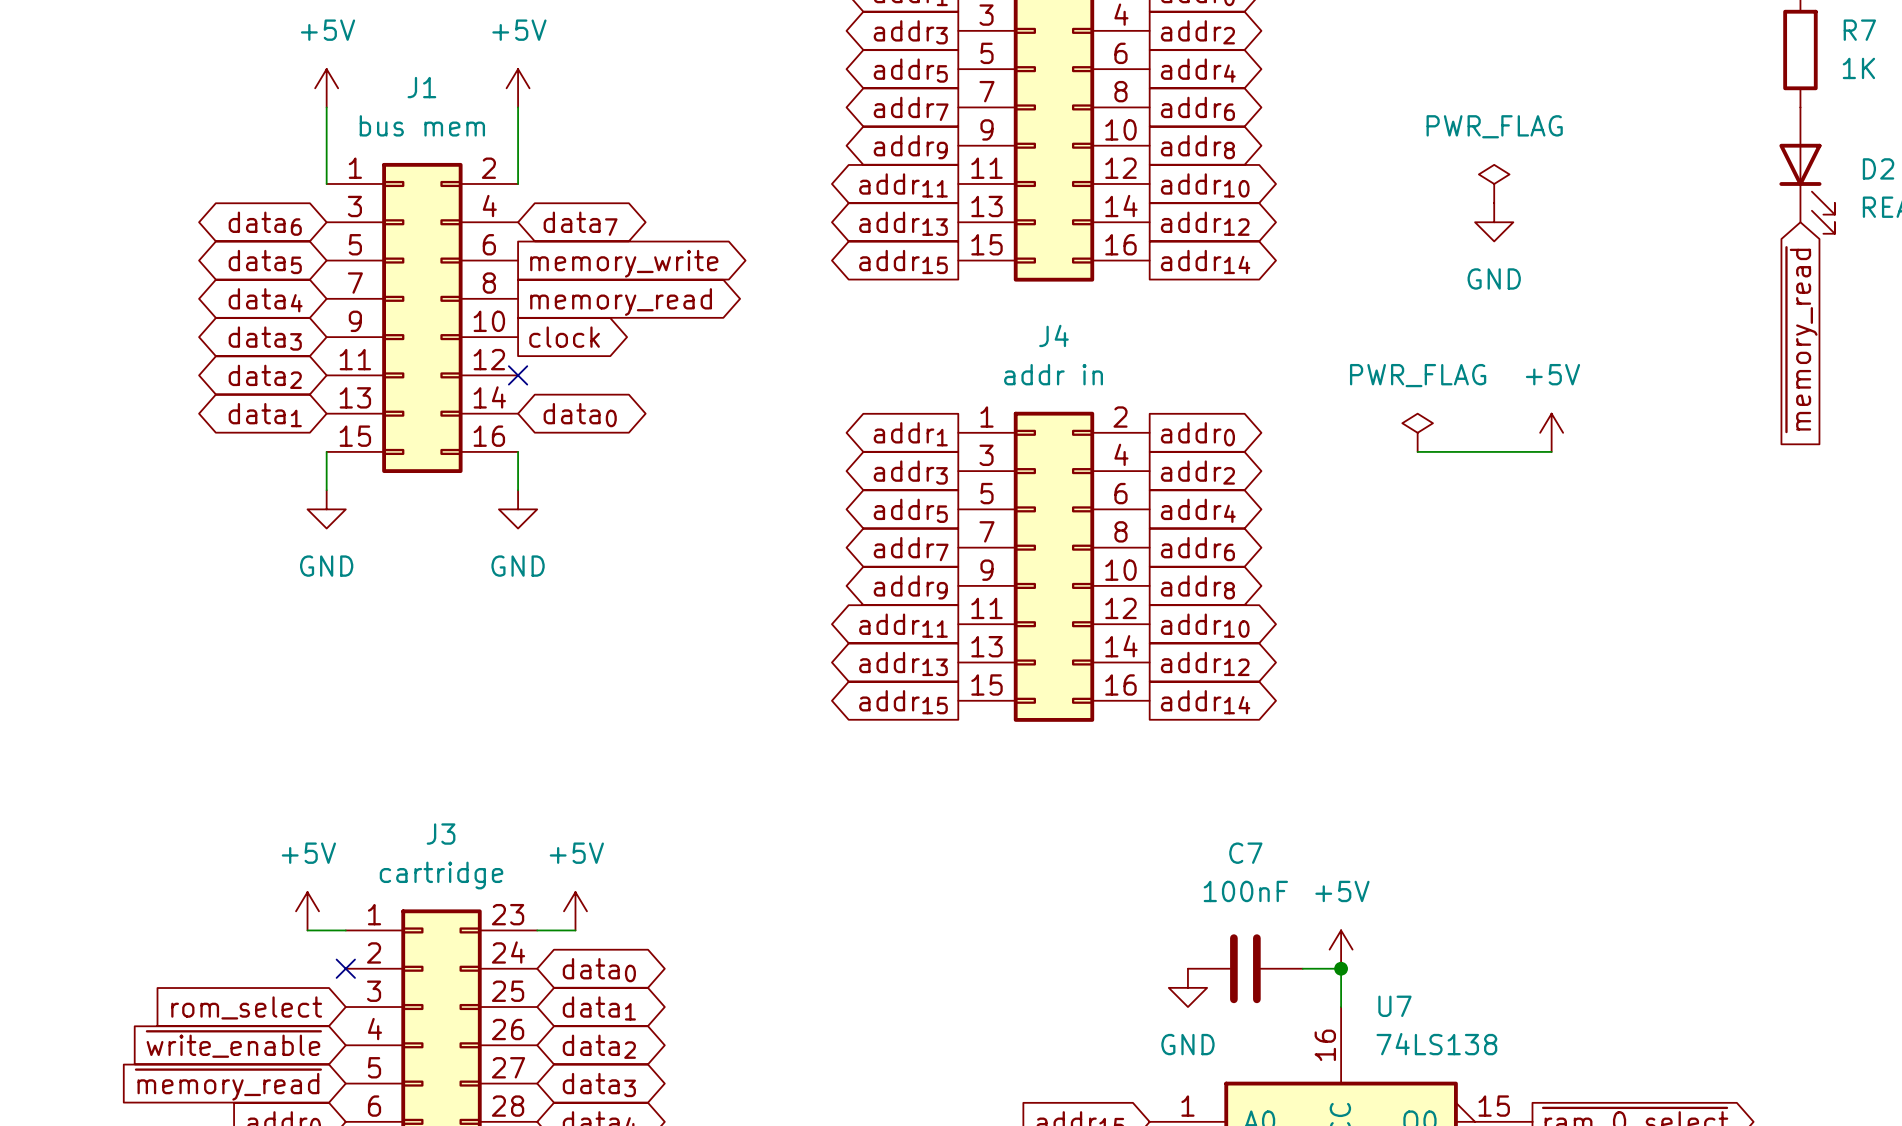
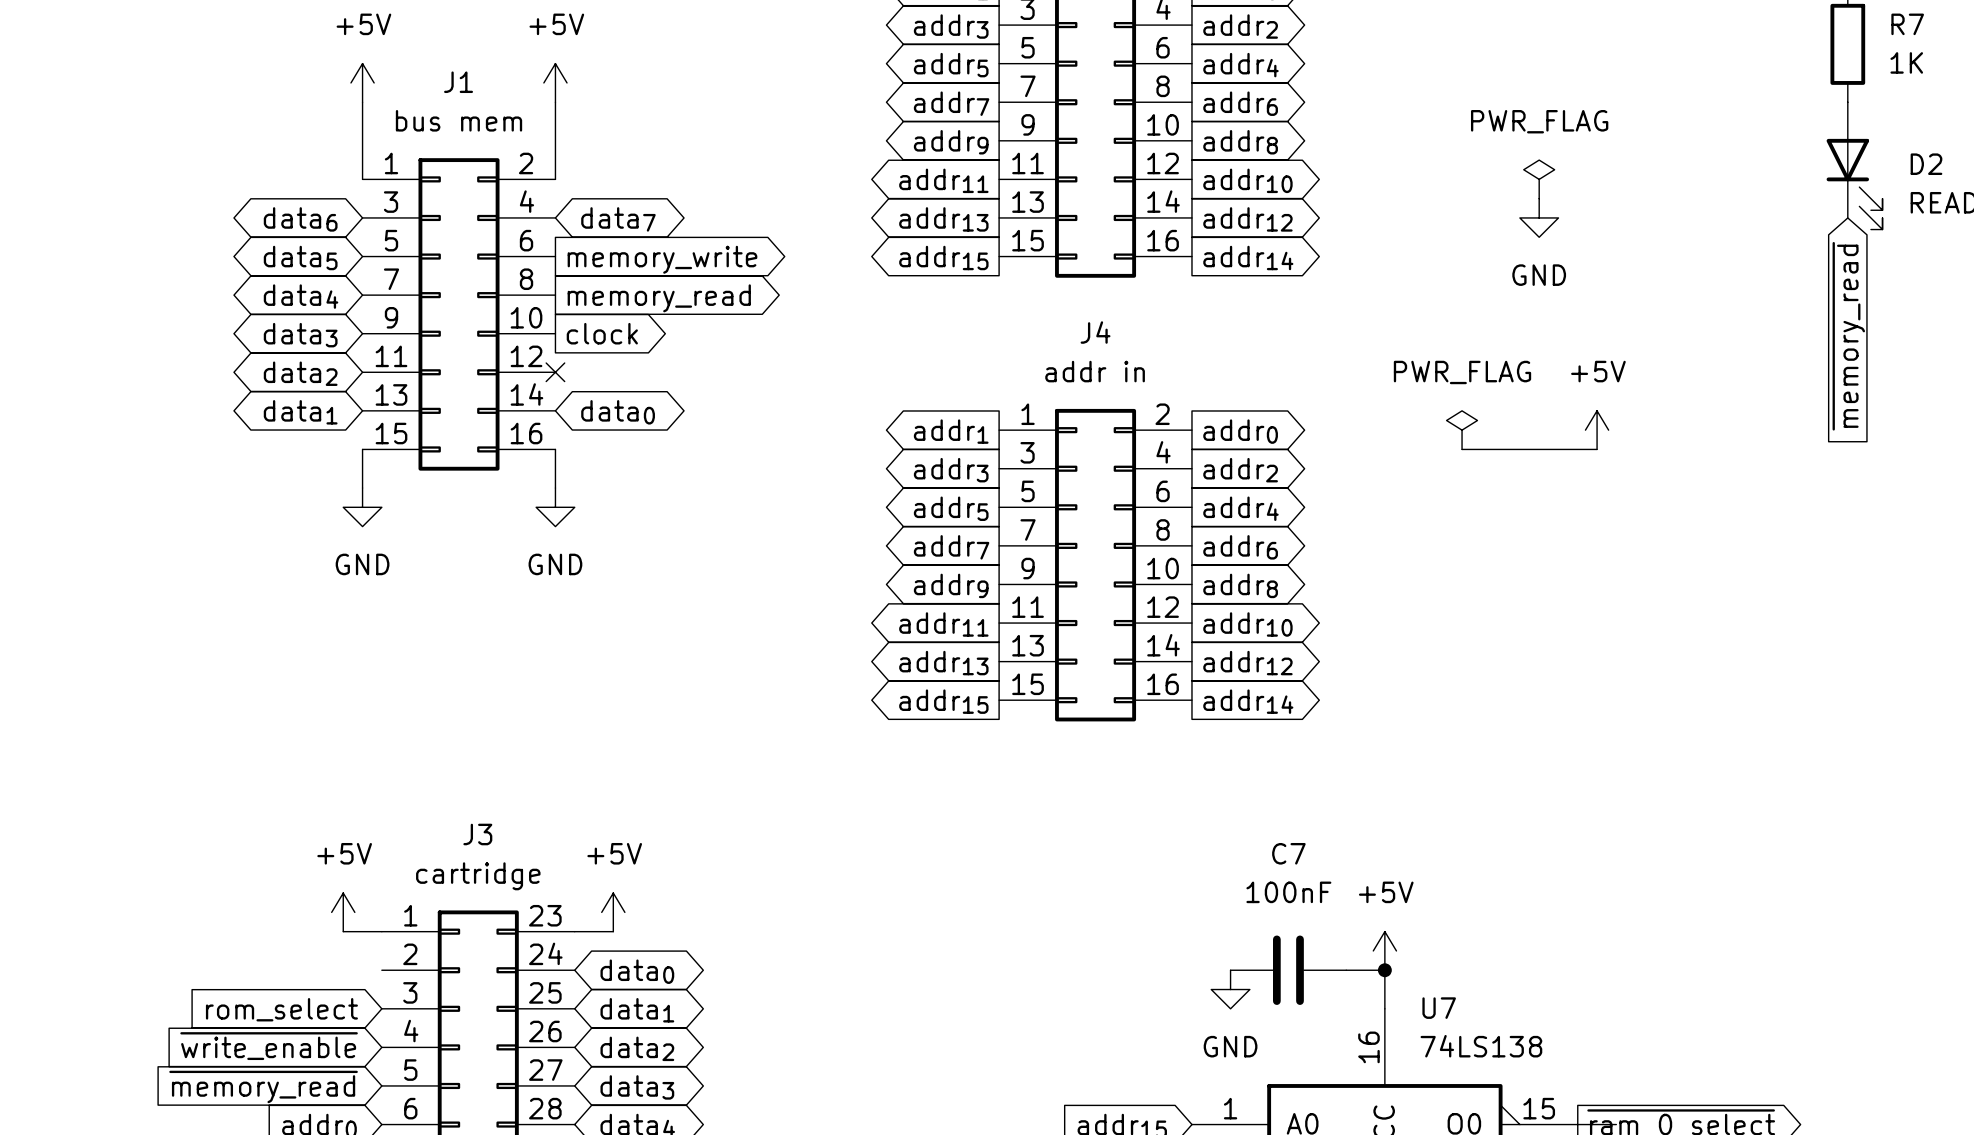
no-connect mark: (345, 968) -> none
wire: none -> (1577, 1124) (1616, 1124)

